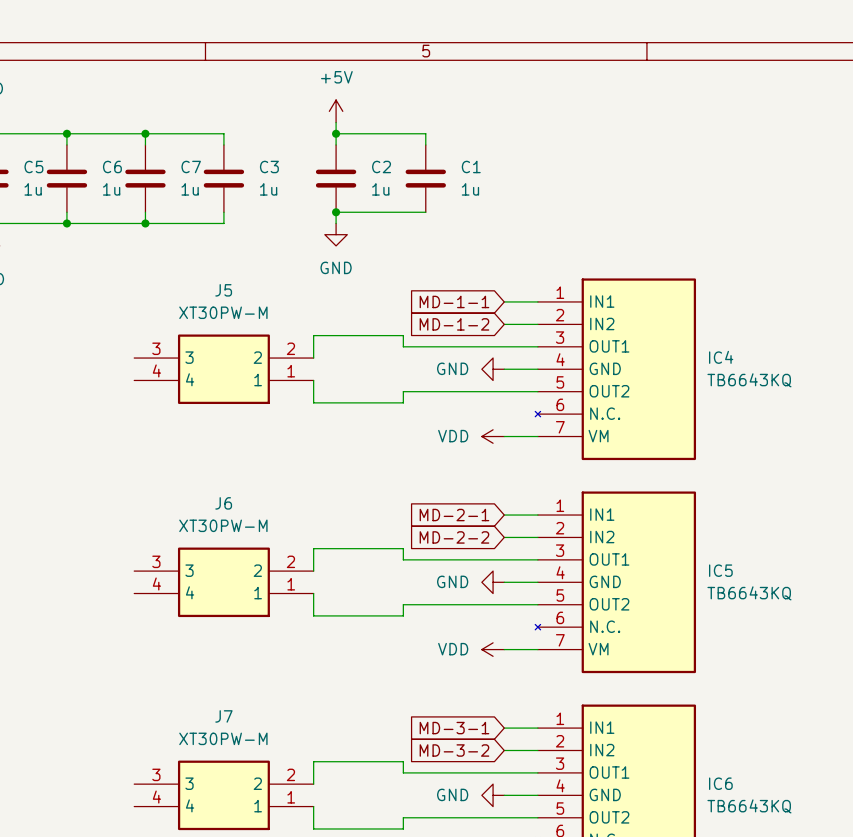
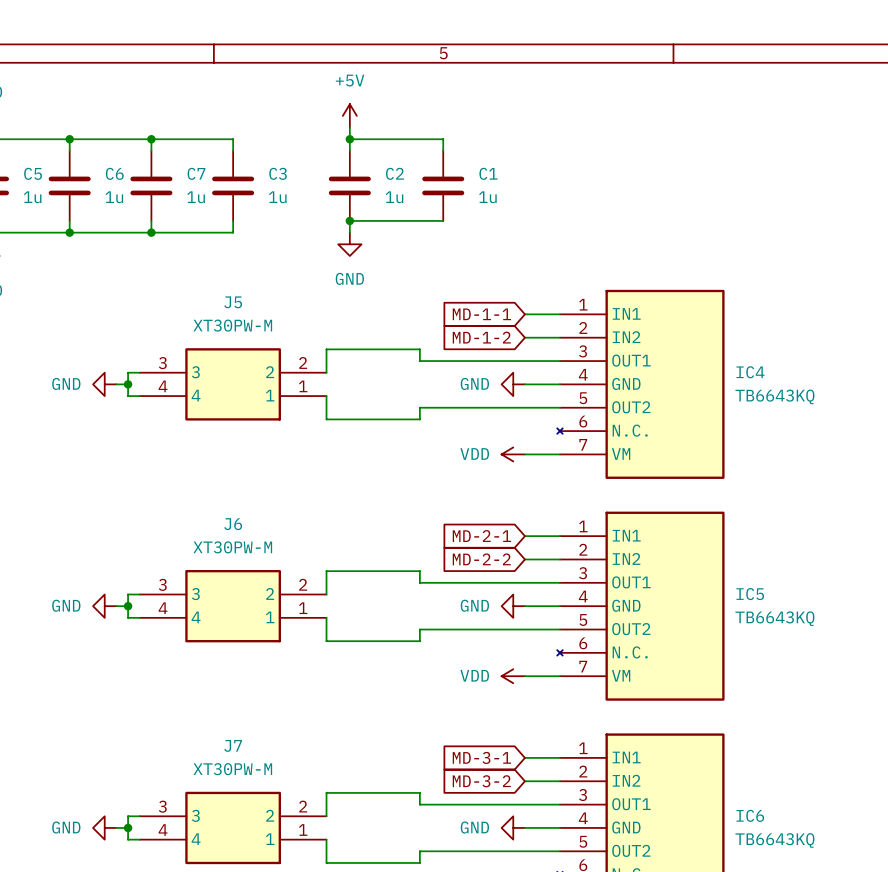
wire: none -> (139, 372) (128, 372) (128, 396) (139, 396)
power symbol: none -> GND (104, 384)
wire: none -> (116, 384) (128, 384)
junction: none -> (128, 384)
wire: none -> (139, 594) (128, 594) (128, 617) (139, 617)
power symbol: none -> GND (104, 606)
wire: none -> (116, 606) (128, 606)
junction: none -> (128, 606)
wire: none -> (139, 816) (128, 816) (128, 839) (139, 839)
power symbol: none -> GND (104, 827)
wire: none -> (116, 827) (128, 827)
junction: none -> (128, 827)

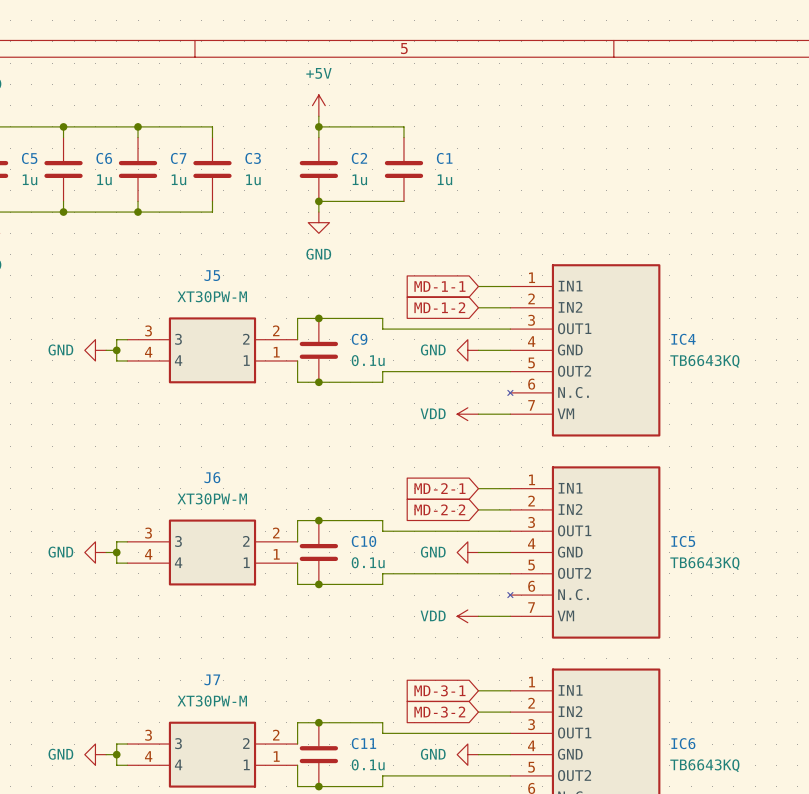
junction: none -> (318, 318)
C9: none -> 0.1u (318, 350)
junction: none -> (318, 382)
junction: none -> (318, 520)
C10: none -> 0.1u (318, 552)
junction: none -> (318, 584)
junction: none -> (318, 722)
C11: none -> 0.1u (318, 754)
junction: none -> (318, 786)

